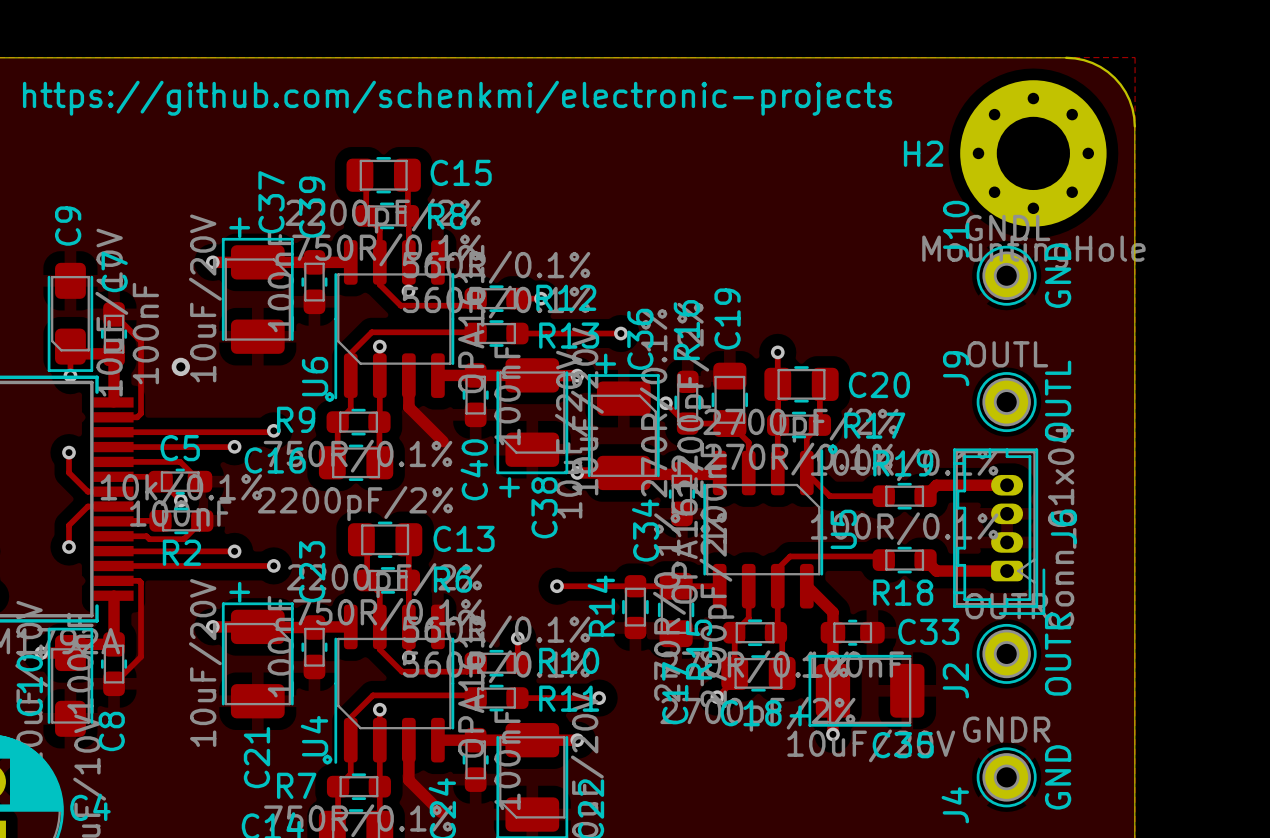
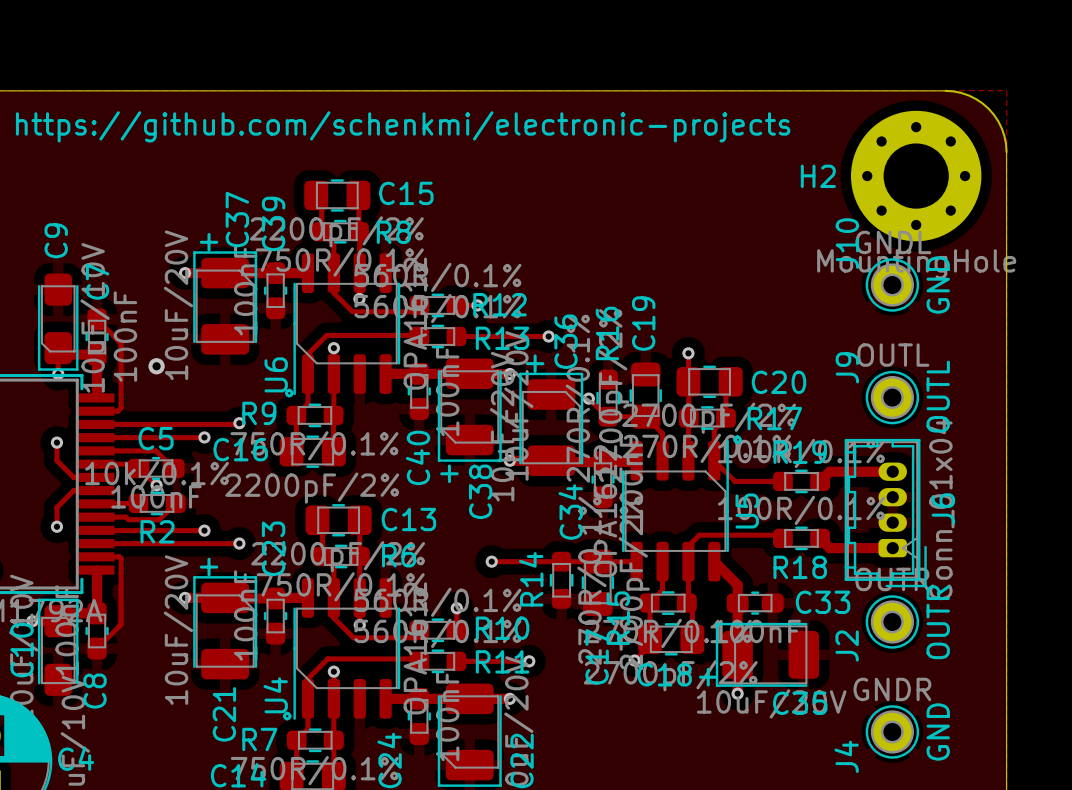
track: (408, 375) (408, 407) (443, 441) -> none
track: (408, 740) (408, 780) (440, 812) -> none

